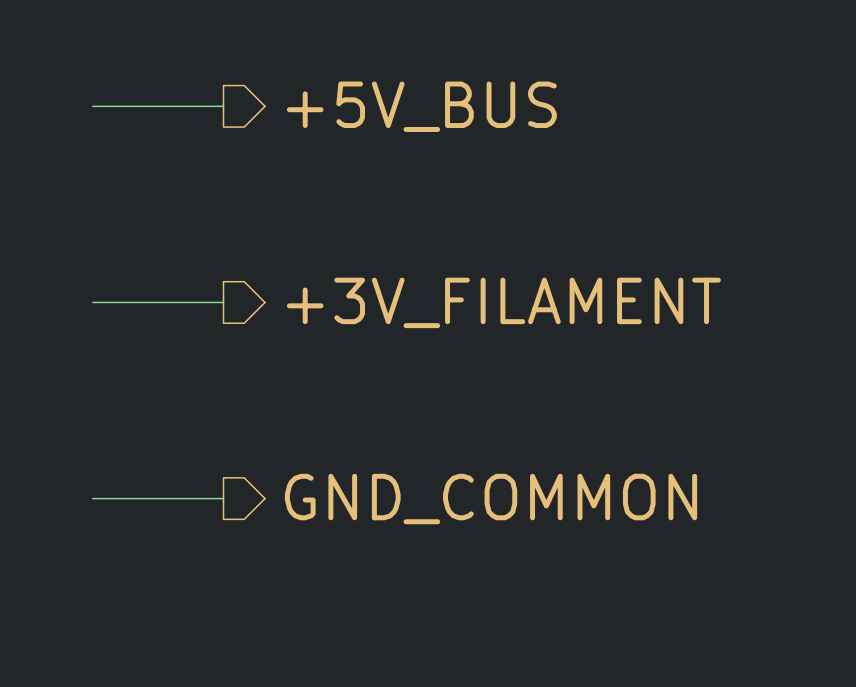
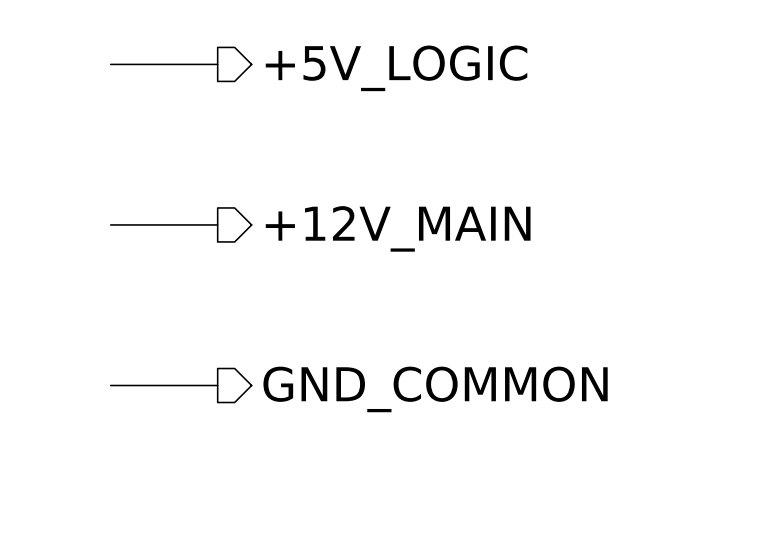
hierarchical label: +5V_BUS (421, 106) -> +5V_LOGIC (396, 68)
hierarchical label: +3V_FILAMENT (503, 302) -> +12V_MAIN (398, 228)

